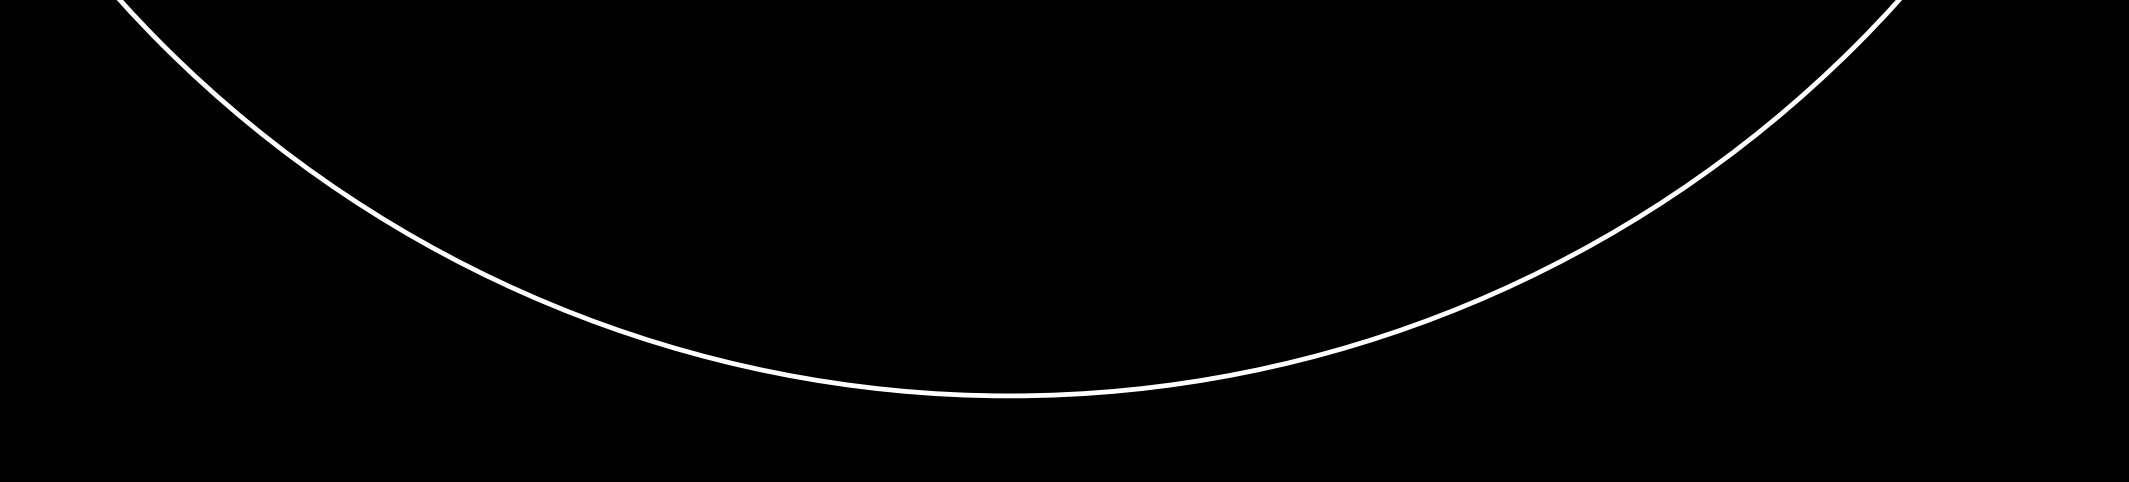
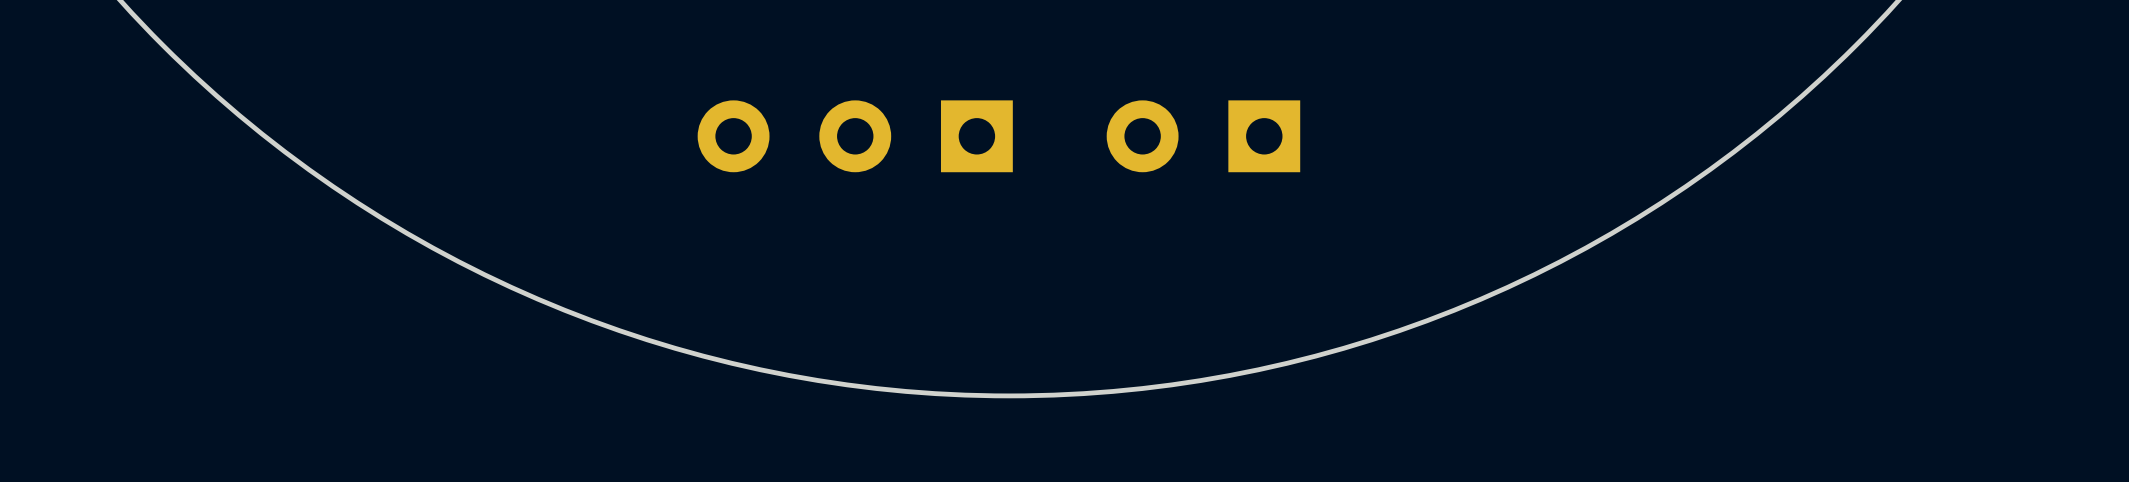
part: none -> (855, 136)
part: none -> (1203, 136)

